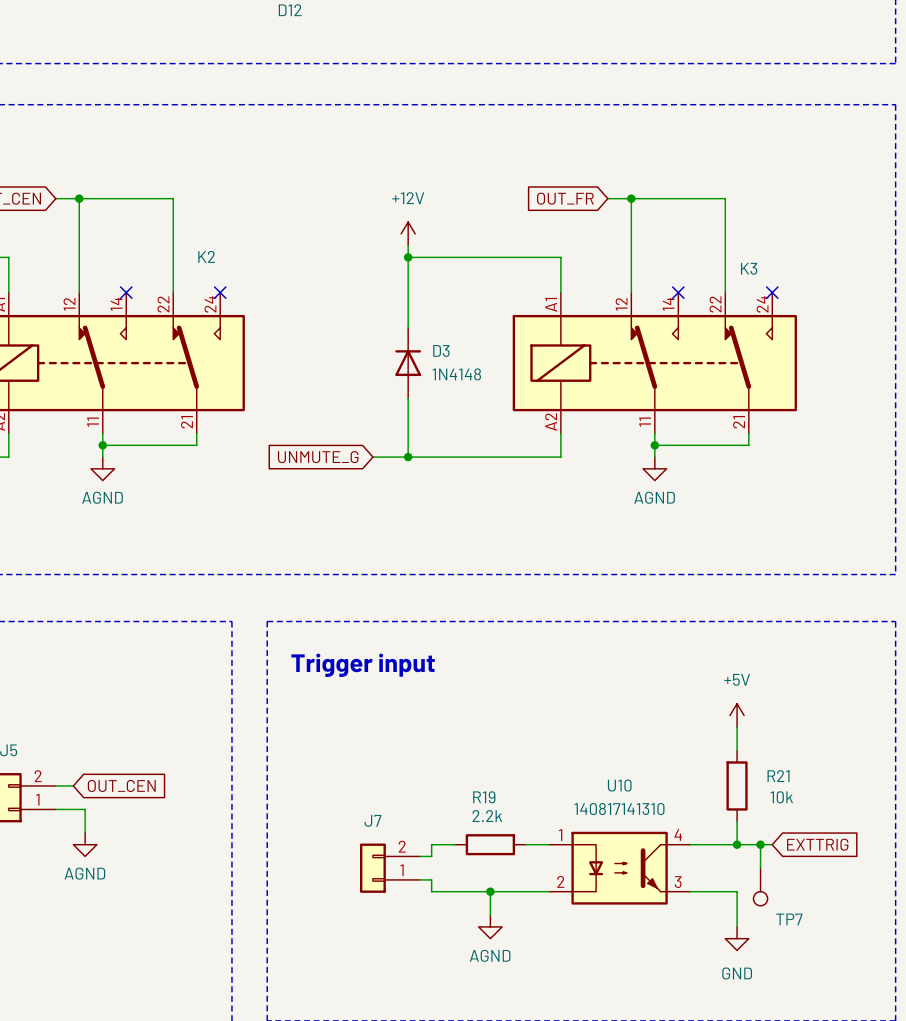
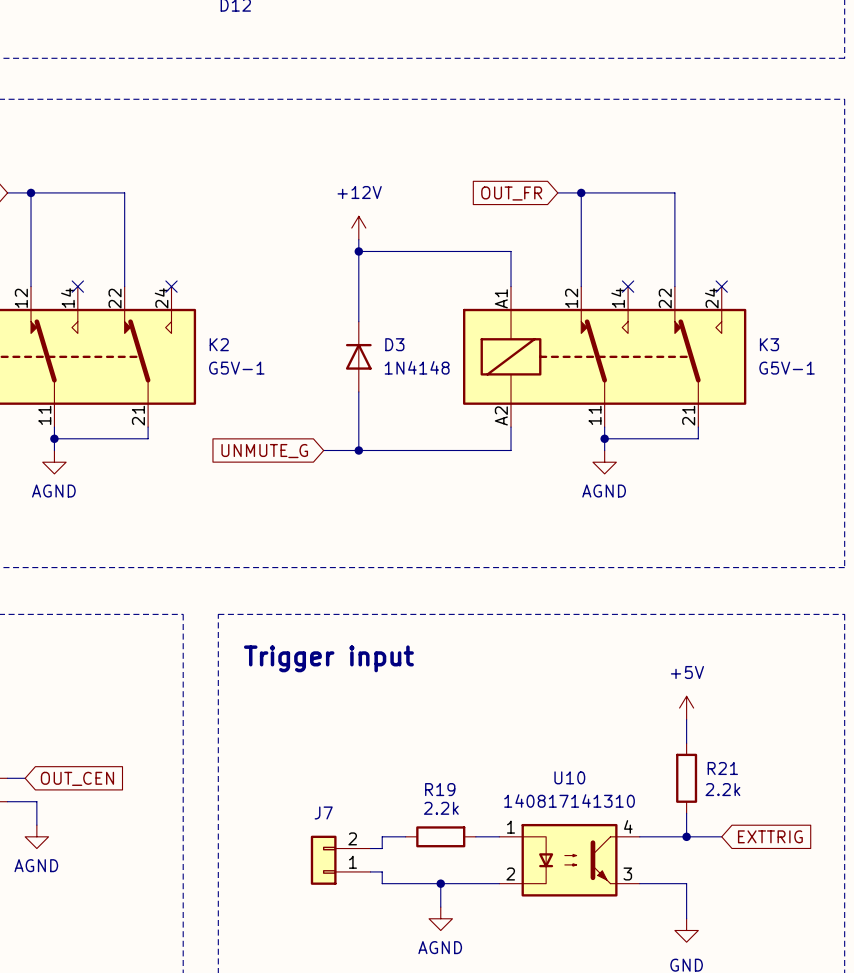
K2 name position: K2 (206, 256) -> K2 (219, 344)
K3 name position: K3 (749, 268) -> K3 (769, 344)
K2 value: none -> G5V-1 (236, 368)
K3 value: none -> G5V-1 (787, 368)
R21 value: 10k (781, 797) -> 2.2k (722, 789)
wire: (760, 844) (760, 868) -> none
junction: (760, 844) -> none
TP7: (760, 886) -> none

